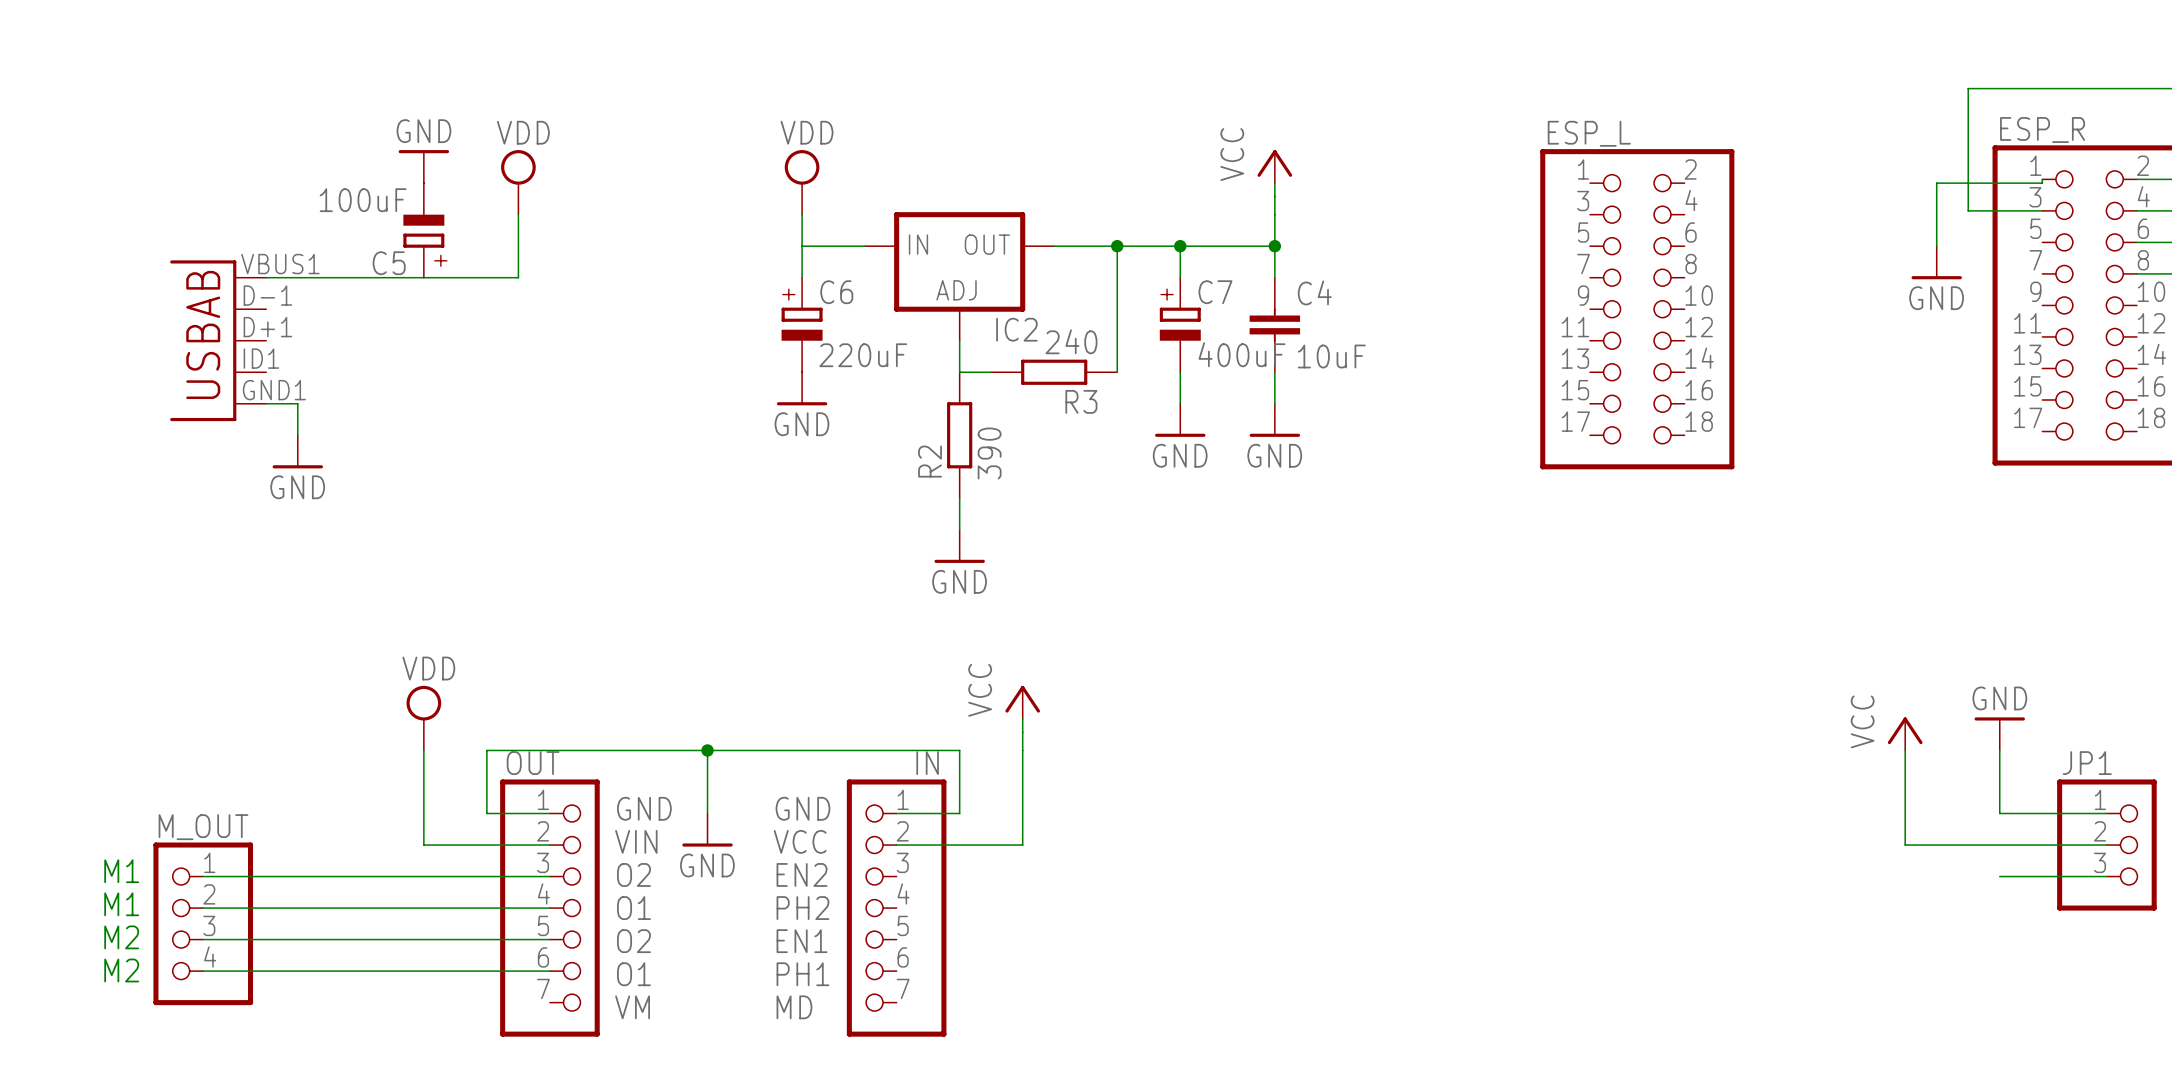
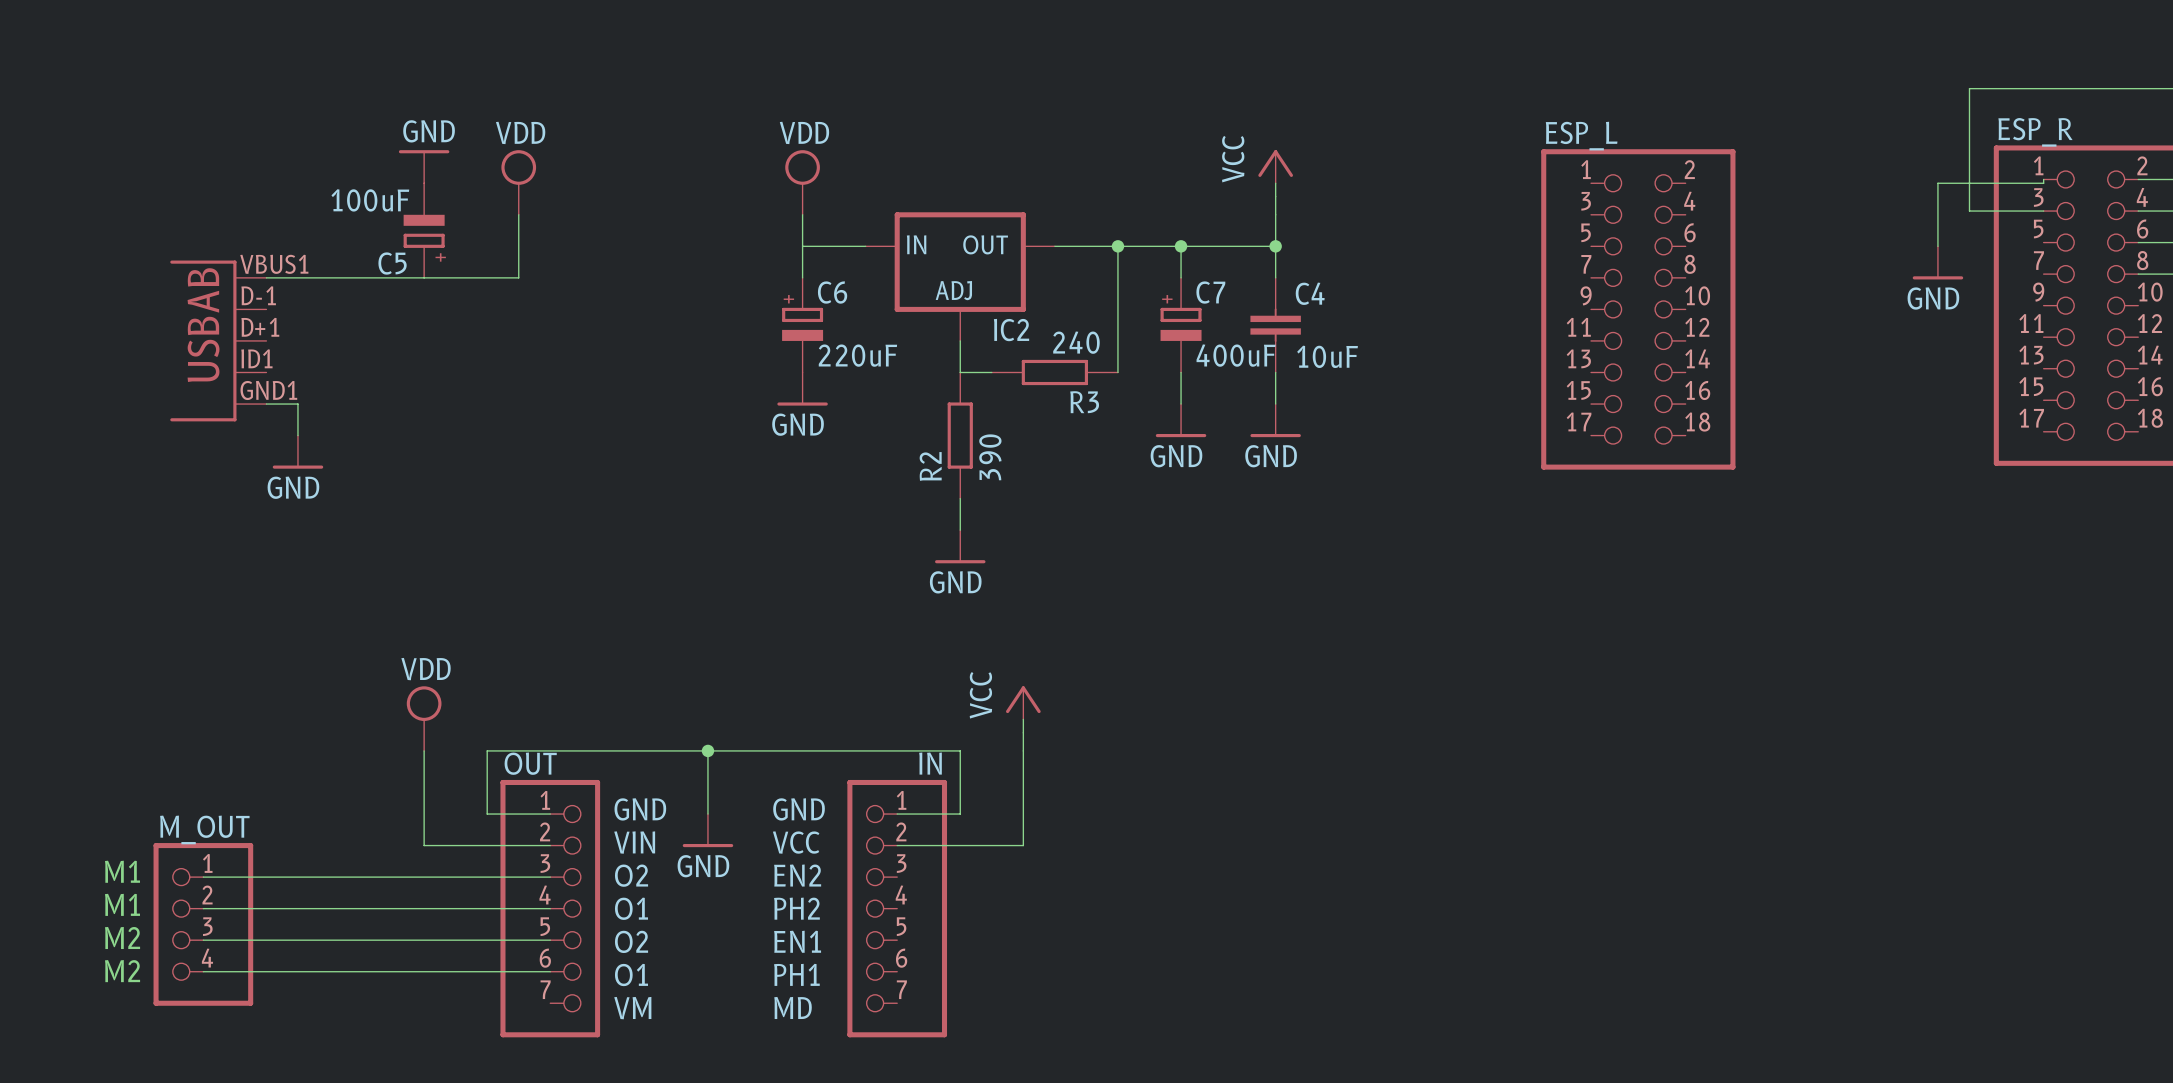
power symbol: VCC (1905, 733) -> none
power symbol: GND (1999, 733) -> none
wire: (1905, 750) (1905, 845) (2106, 845) -> none
wire: (1999, 750) (1999, 813) (2106, 813) -> none
JP1: (2106, 845) -> none
wire: (1999, 876) (2106, 876) -> none

